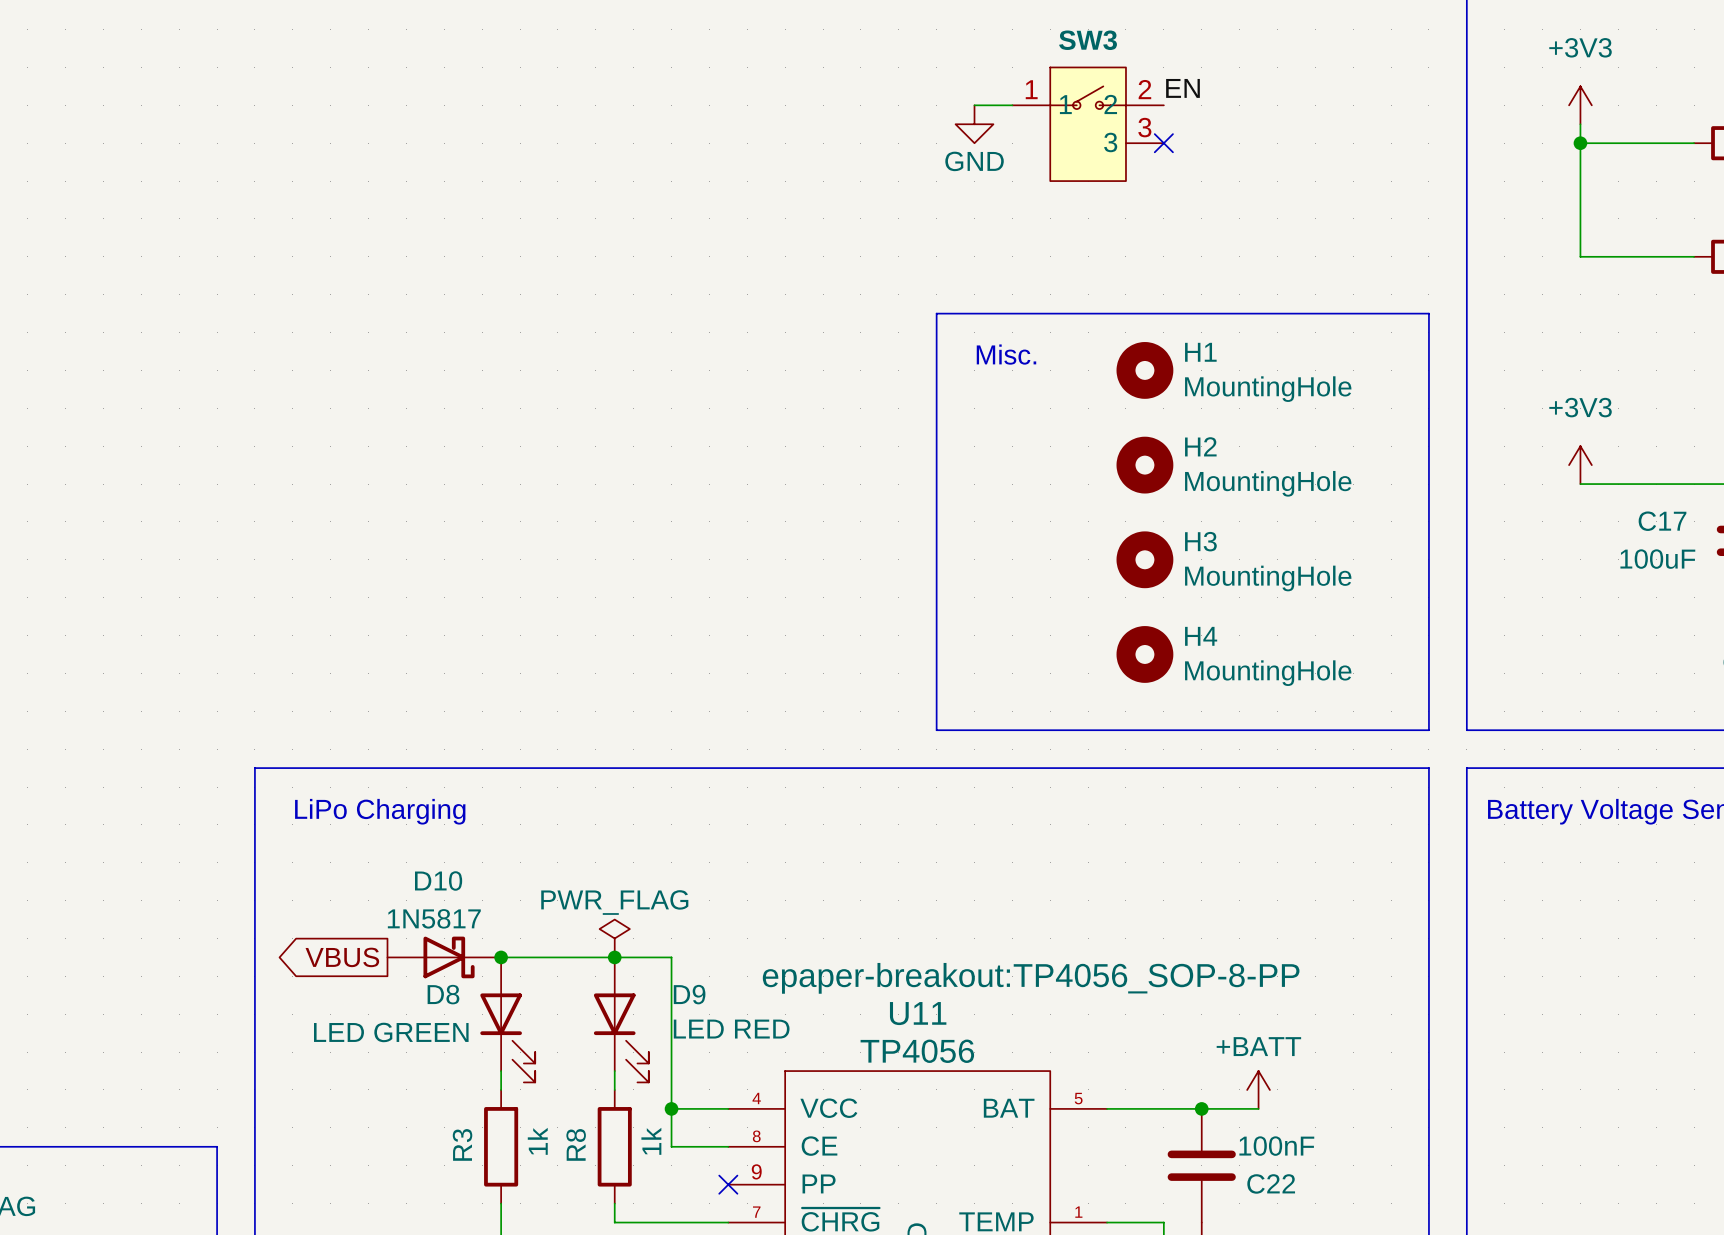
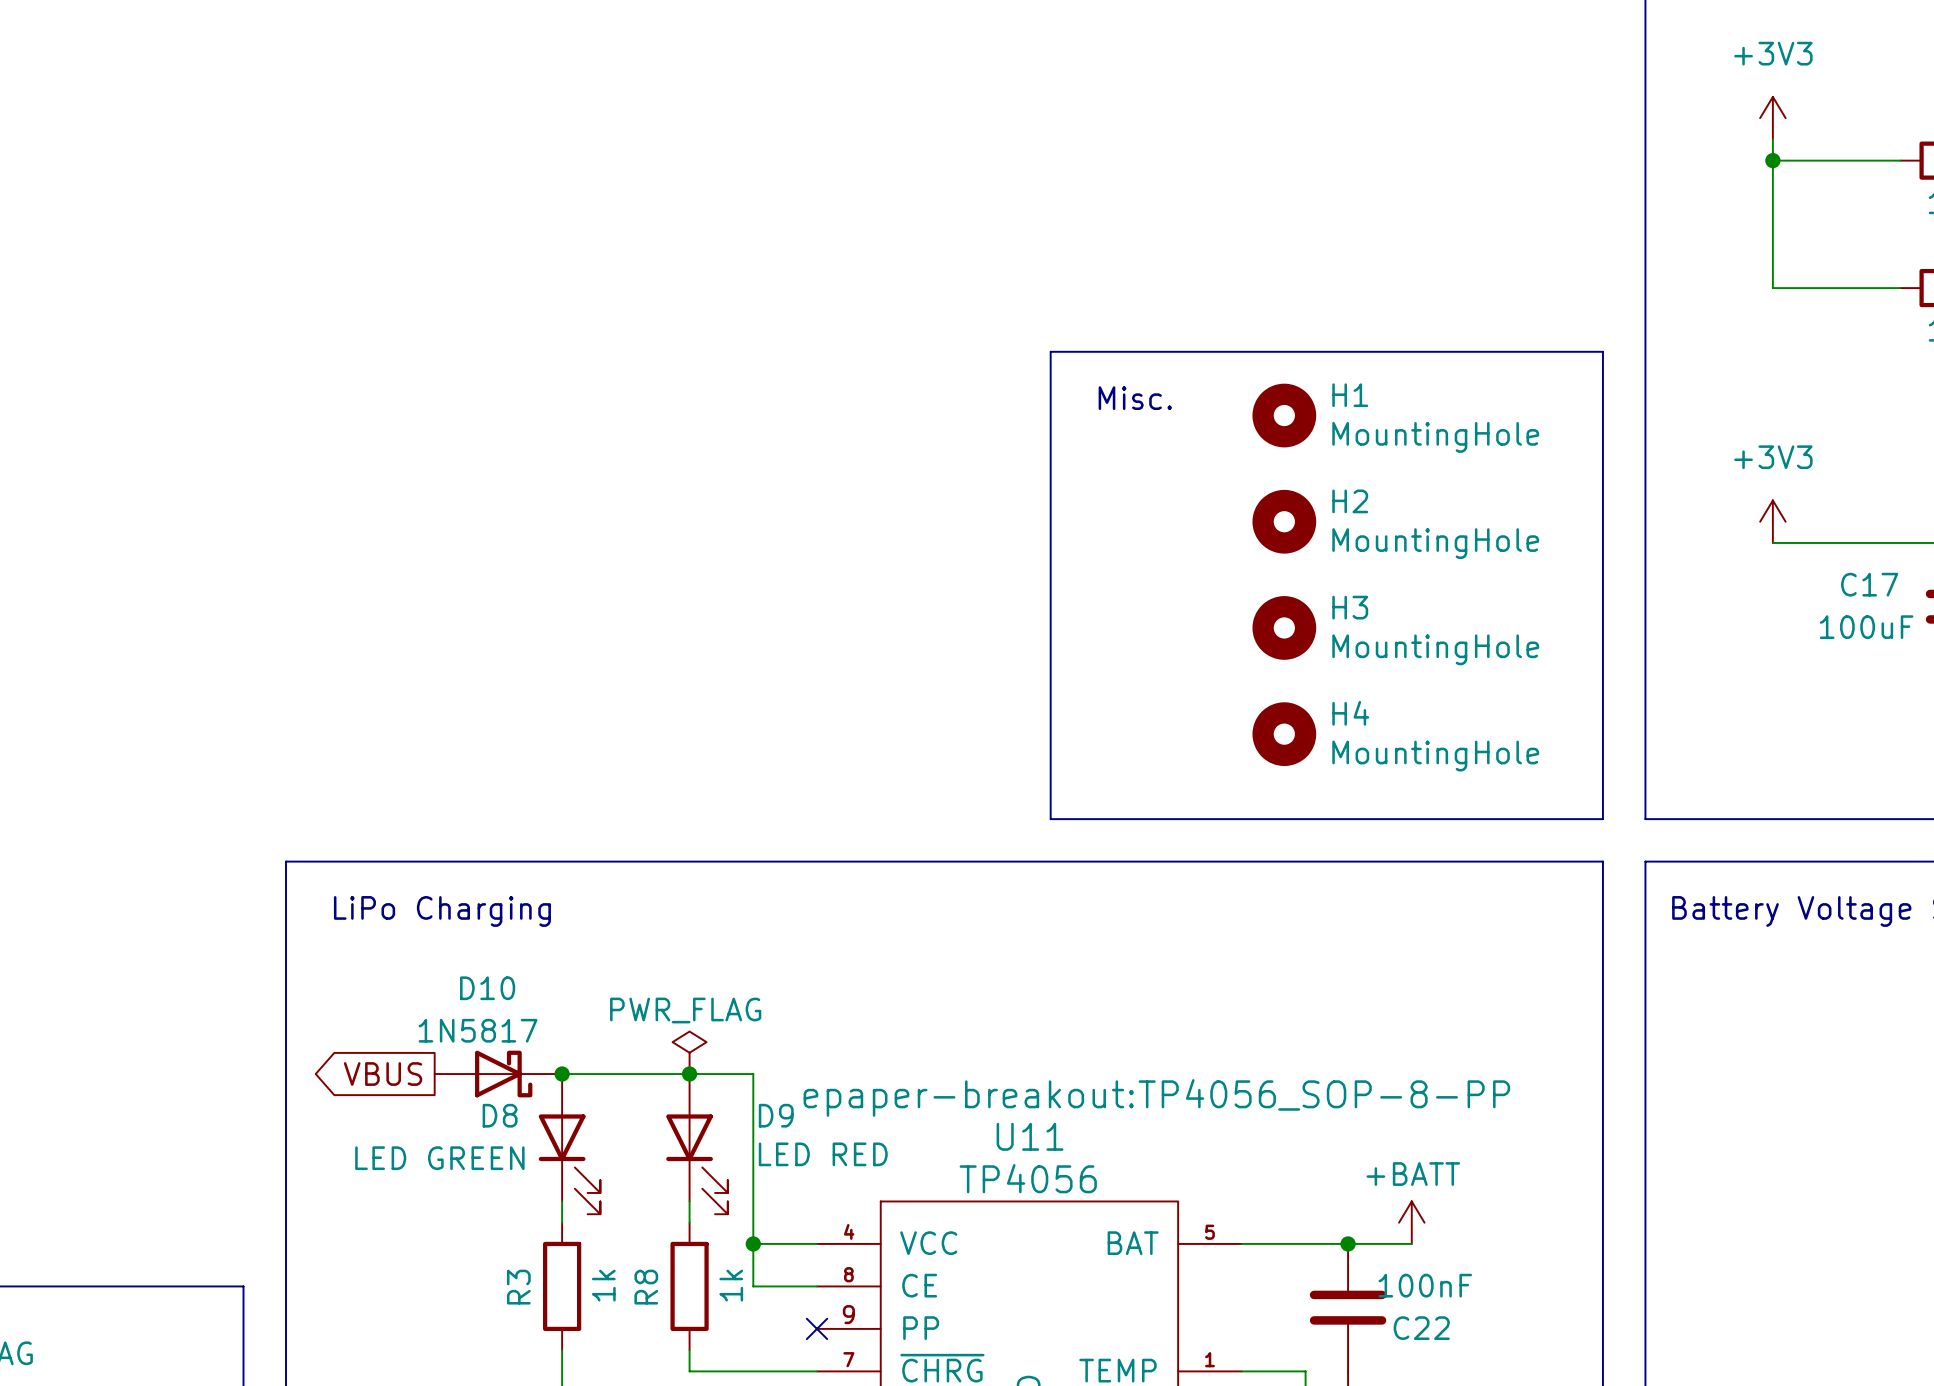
label: EN (1182, 88) -> none
wire: (974, 105) (1012, 105) -> none
power symbol: GND (974, 124) -> none
SW3: (1088, 124) -> none
no-connect mark: (1163, 143) -> none

